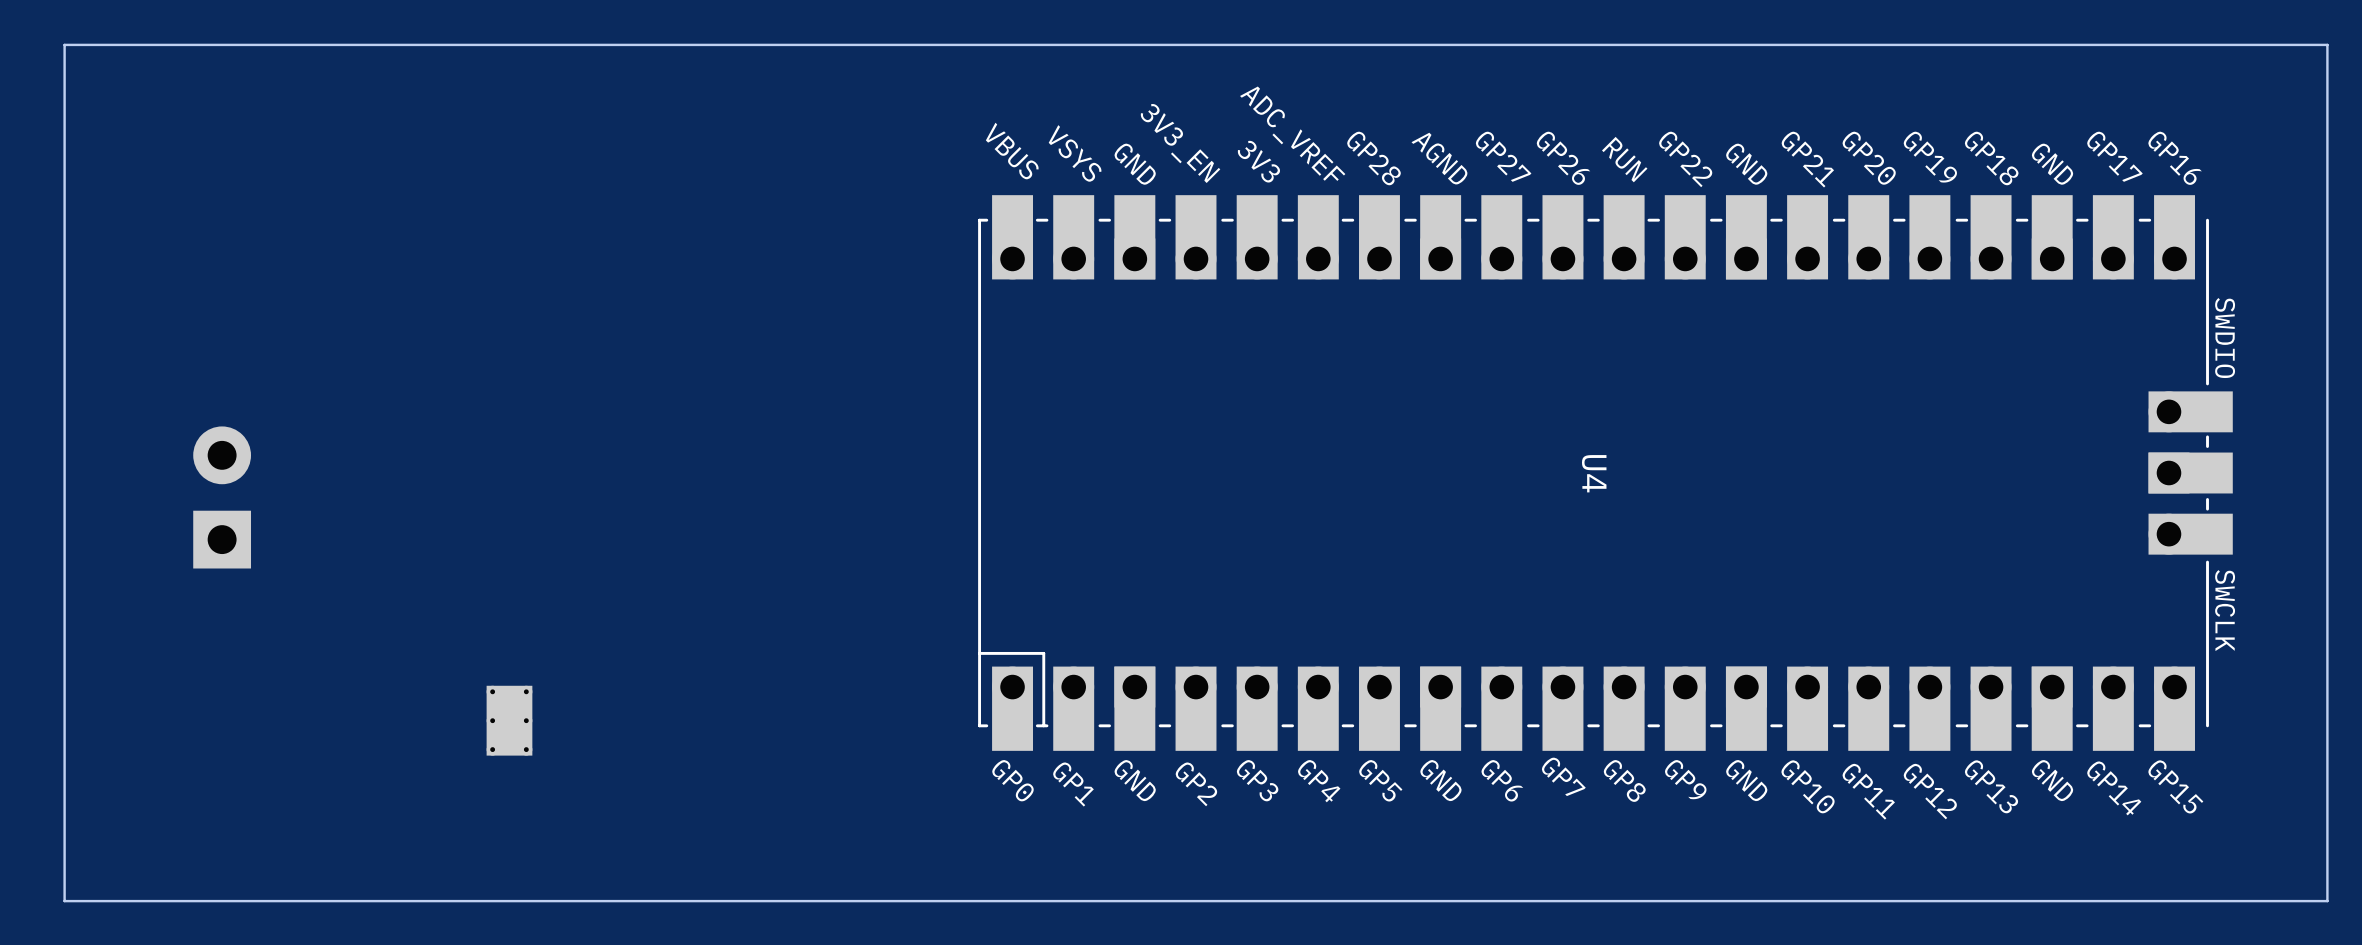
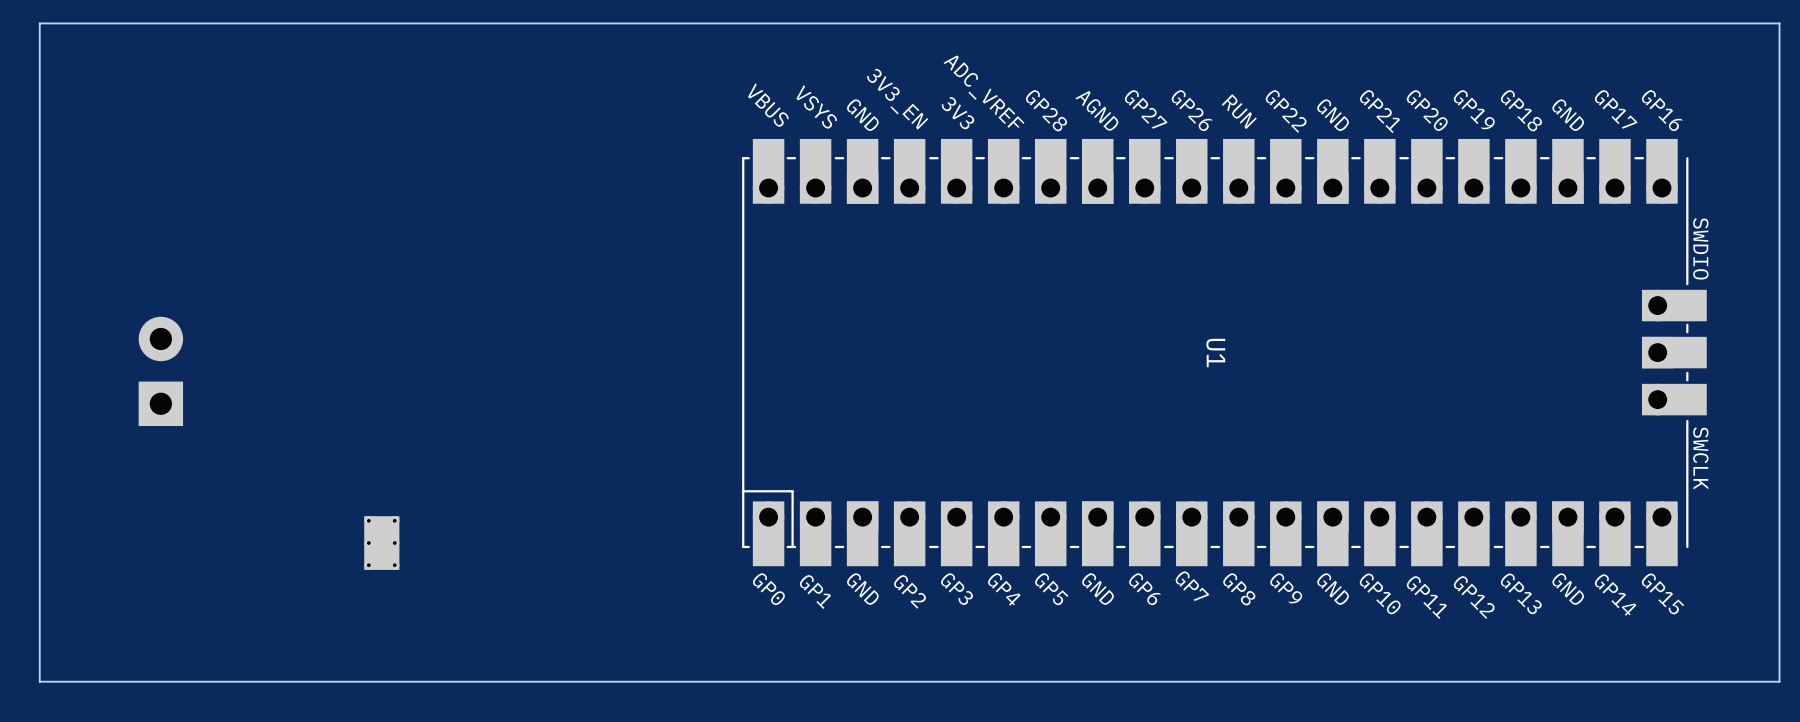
U4 name: U4 (1594, 473) -> U1 (1215, 353)

